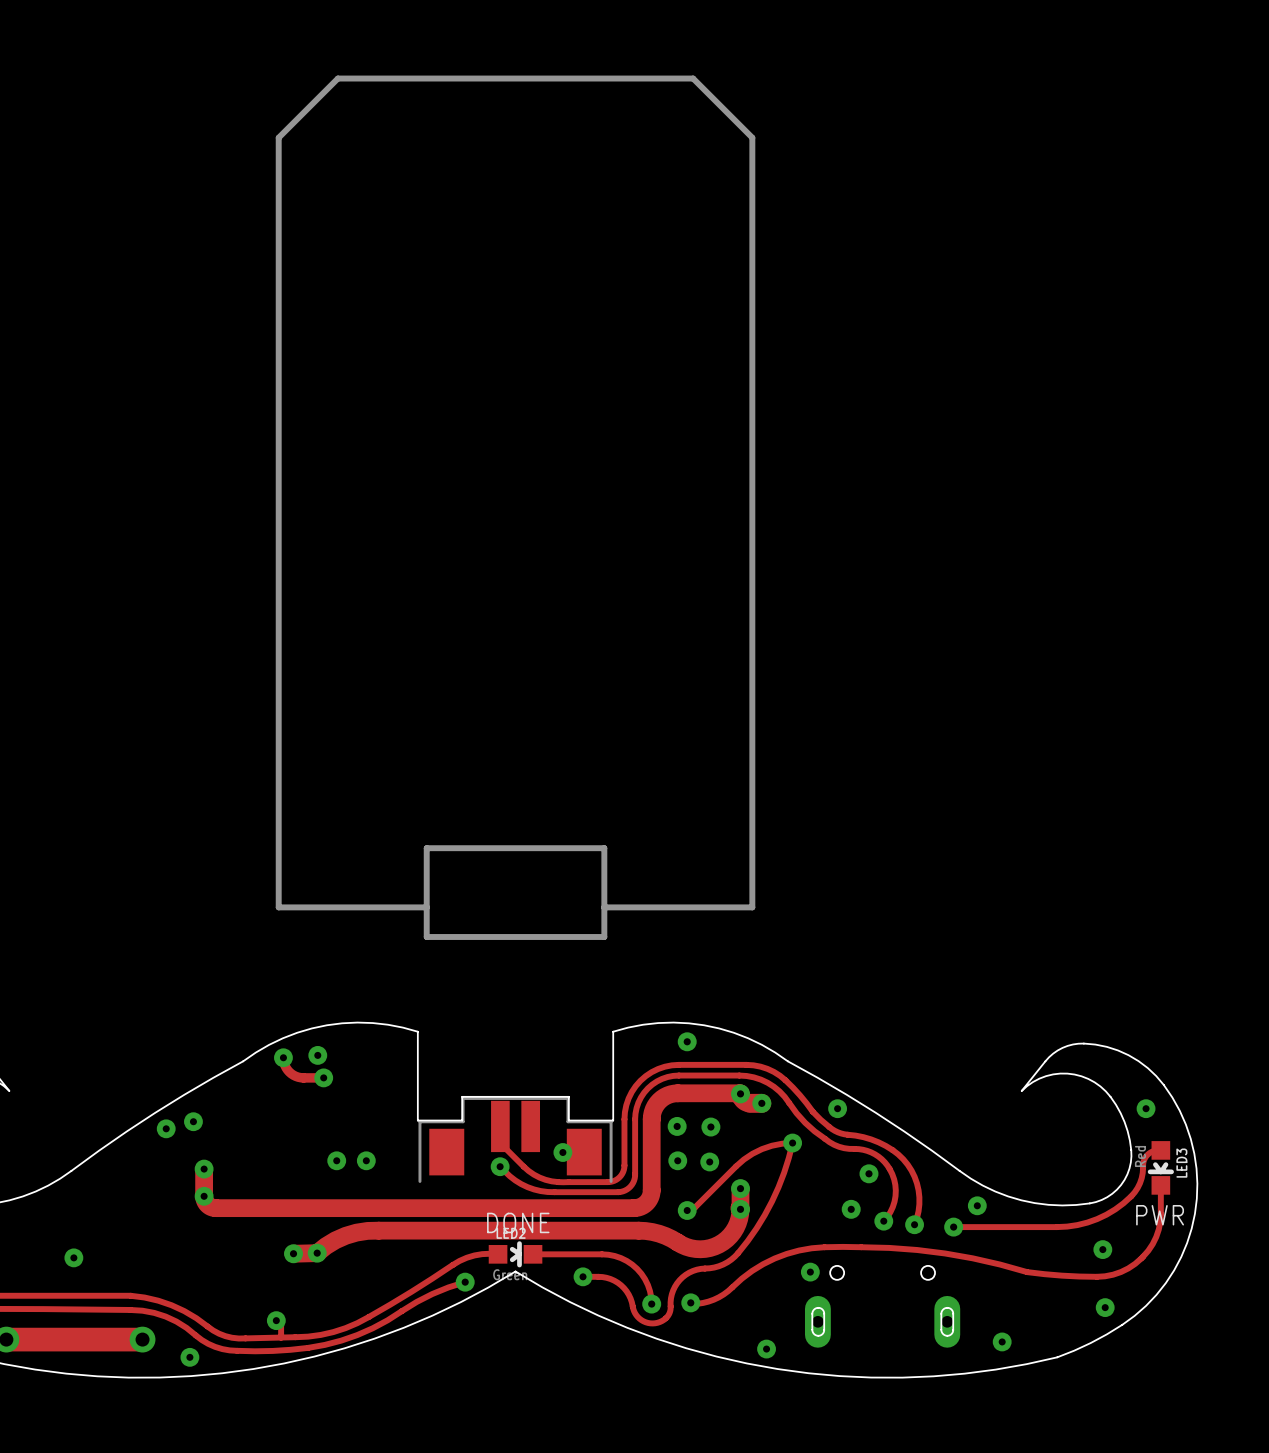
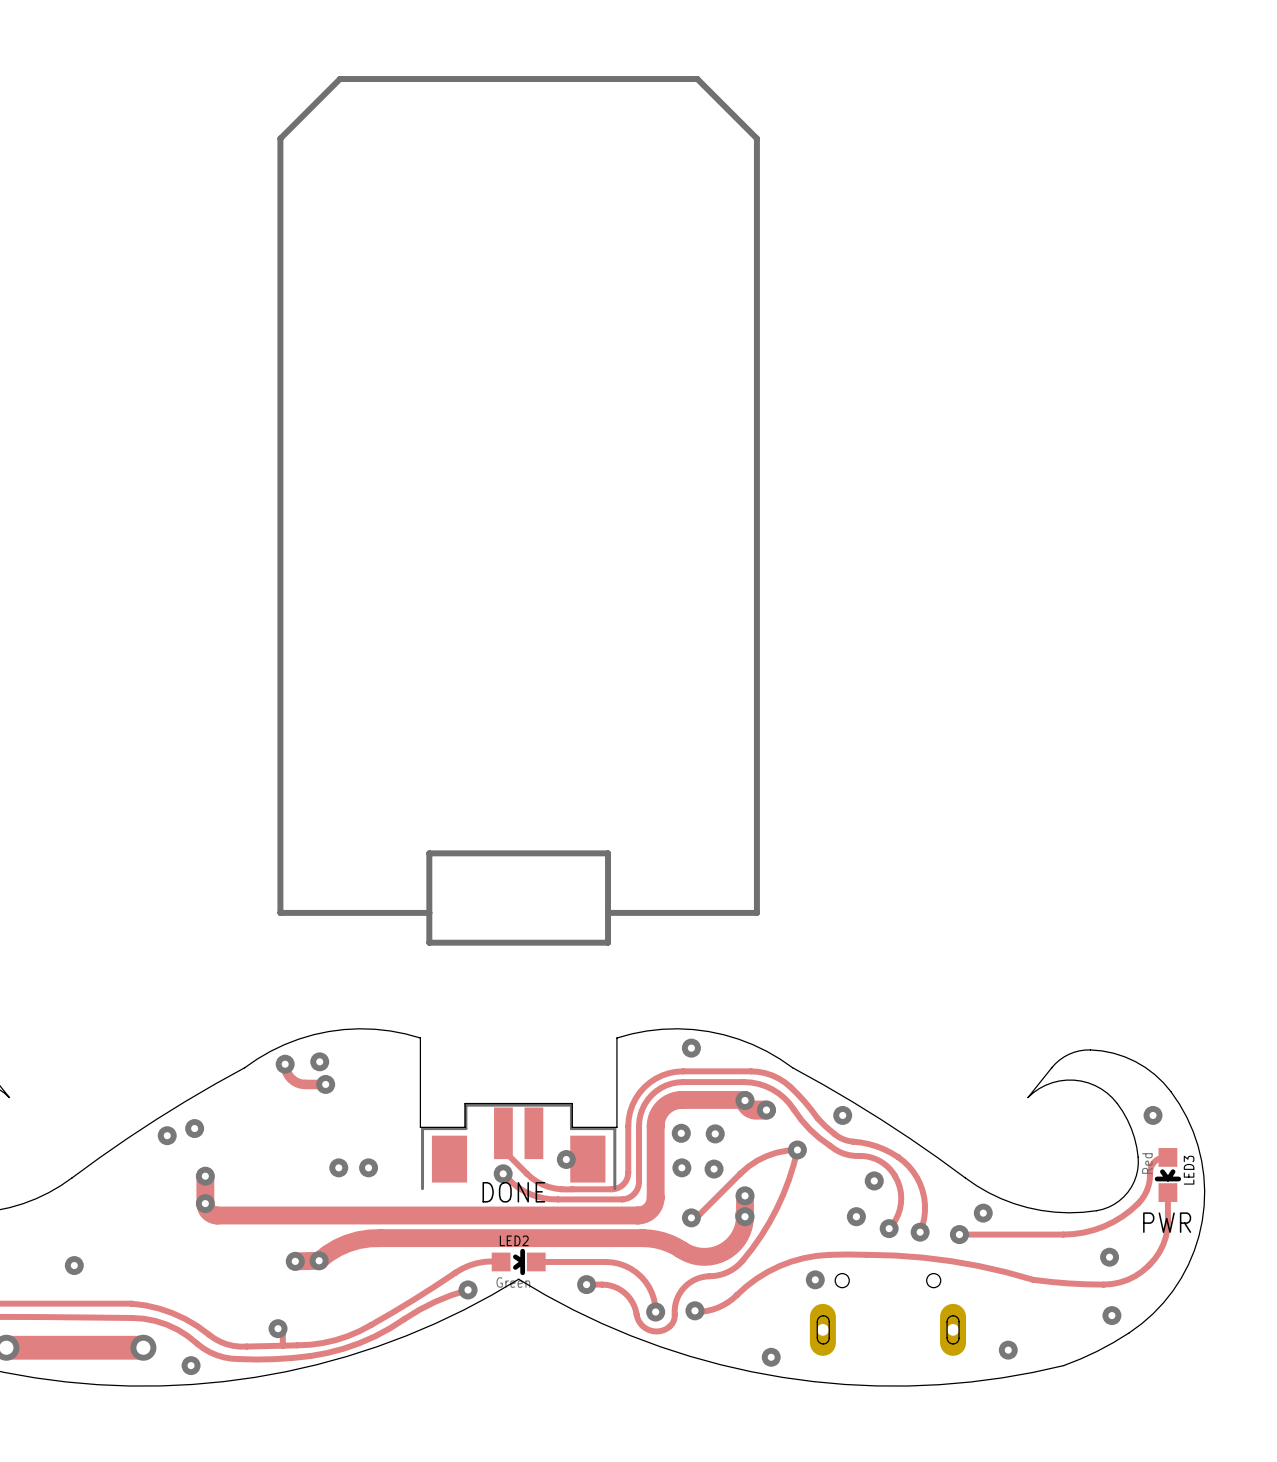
text position: DONE (518, 1222) -> DONE (513, 1192)

